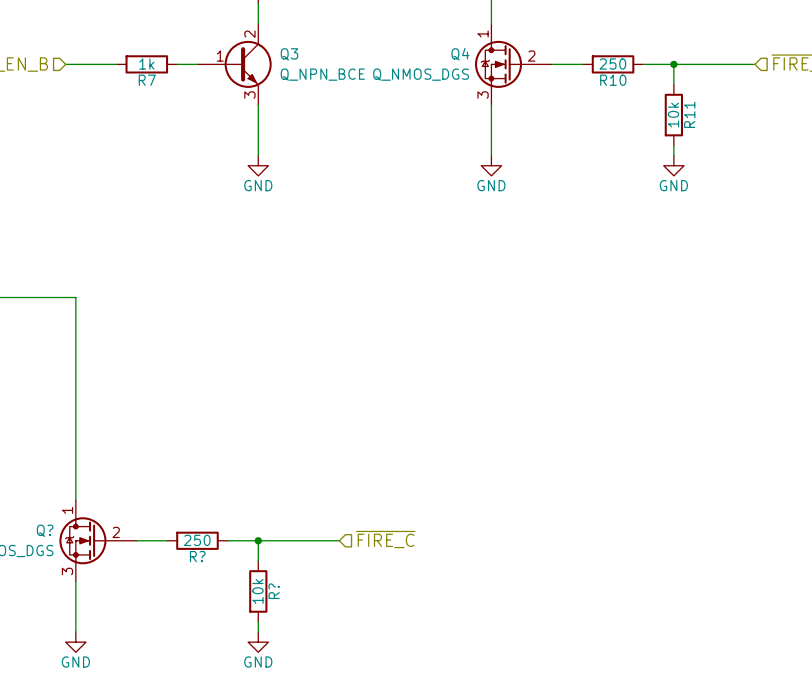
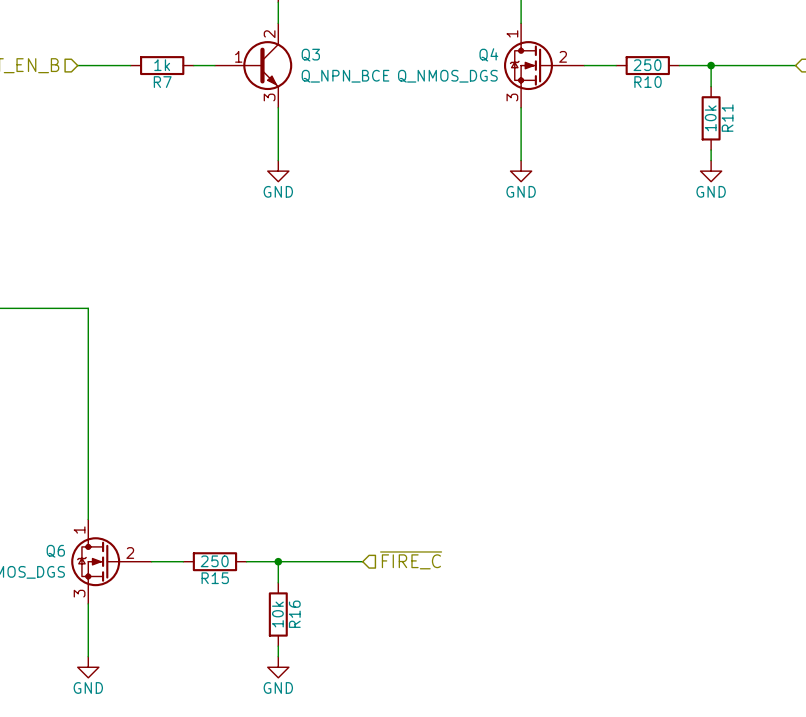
Q? name: Q? (45, 530) -> Q6 (55, 551)
R? name: R? (197, 556) -> R15 (215, 578)
R? name: R? (274, 591) -> R16 (294, 614)

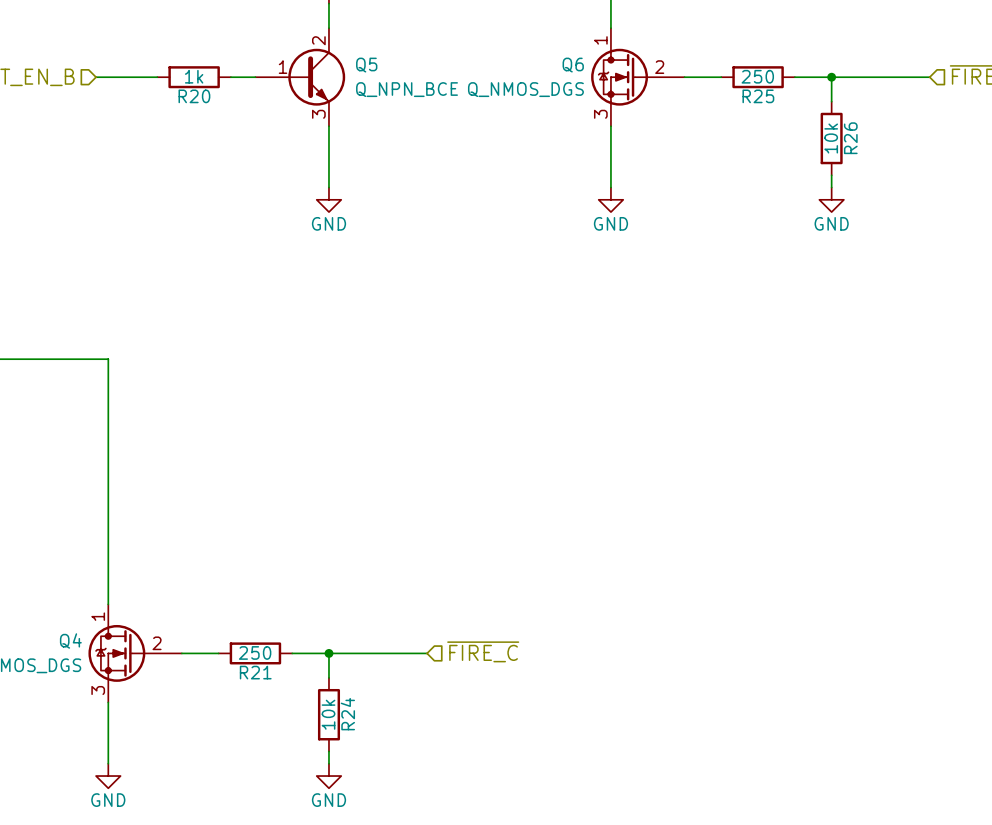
Q4 name: Q4 (488, 54) -> Q6 (573, 65)
Q3 name: Q3 (310, 55) -> Q5 (366, 65)
R7 name: R7 (162, 82) -> R20 (194, 96)
R10 name: R10 (648, 82) -> R25 (758, 96)
R11 name: R11 (727, 118) -> R26 (850, 138)
Q6 name: Q6 (55, 551) -> Q4 (70, 640)
R15 name: R15 (215, 578) -> R21 (255, 672)
R16 name: R16 (294, 614) -> R24 (347, 714)

